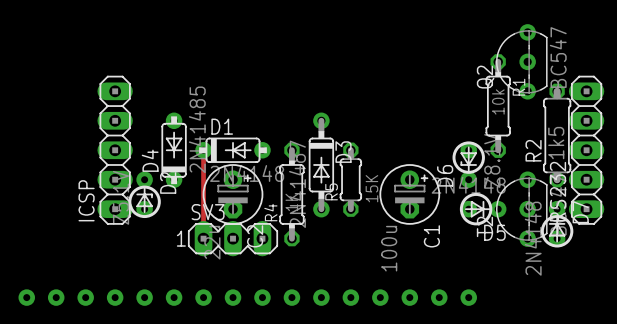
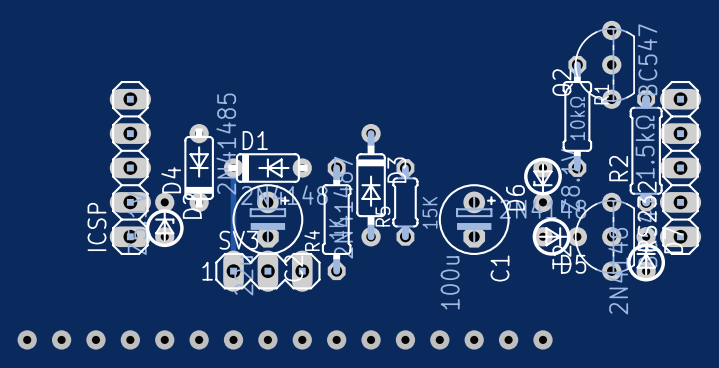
R1 value: 10k (498, 101) -> 10kΩ (577, 118)
R2 value: 1k5 (556, 143) -> 1.5kΩ (645, 147)

